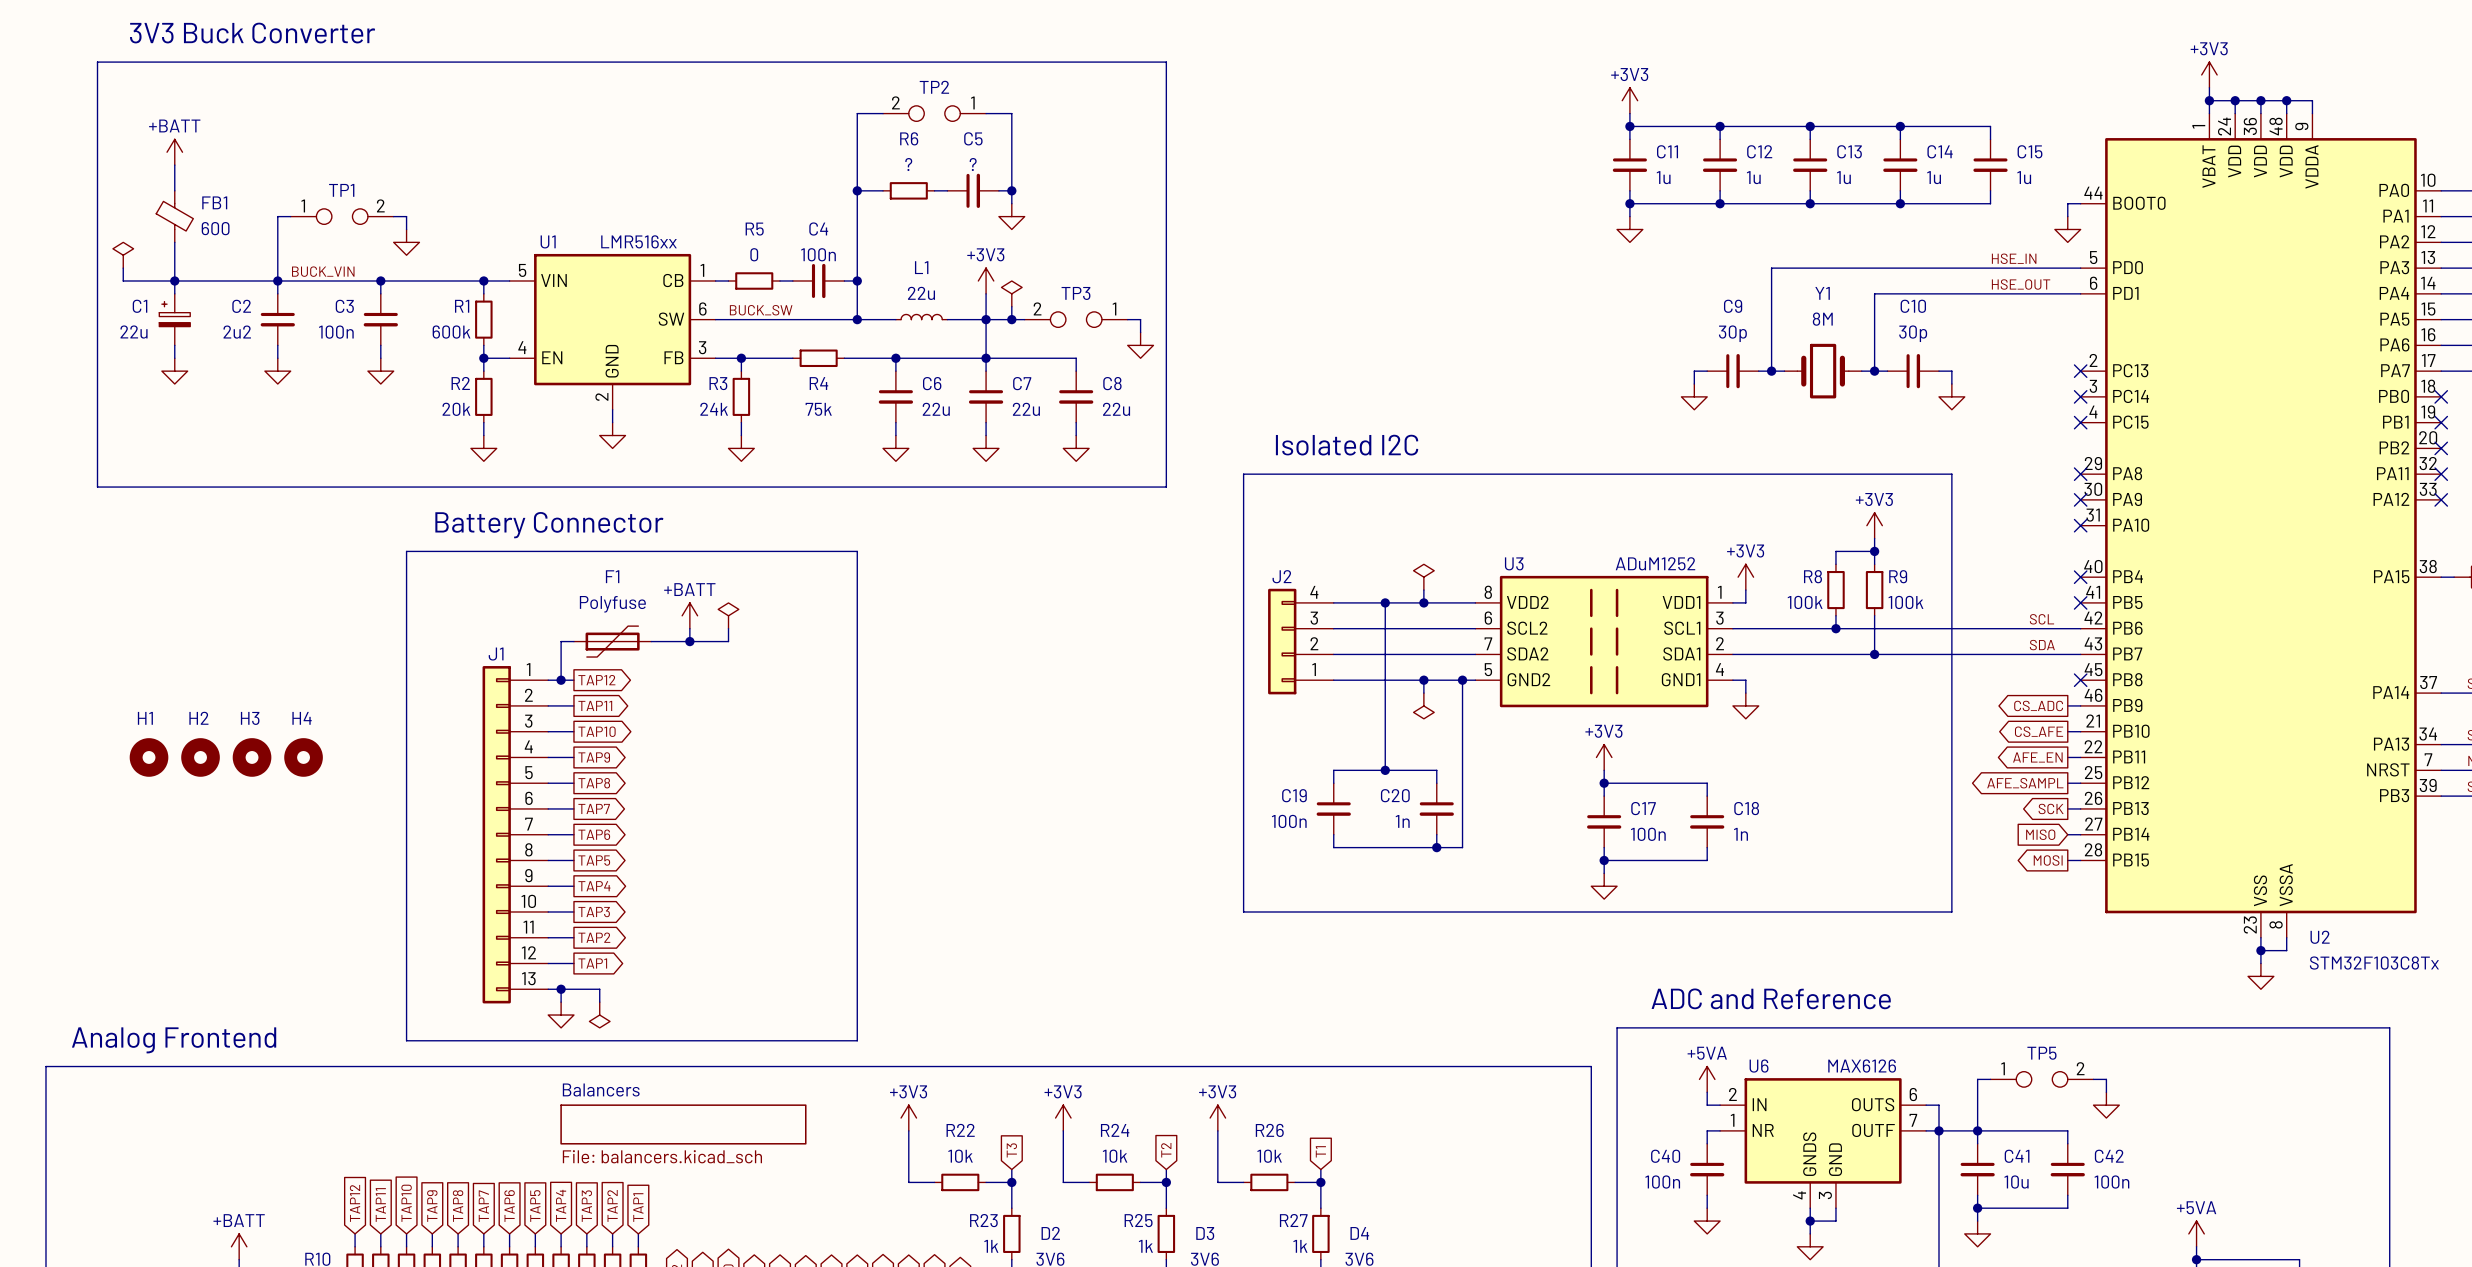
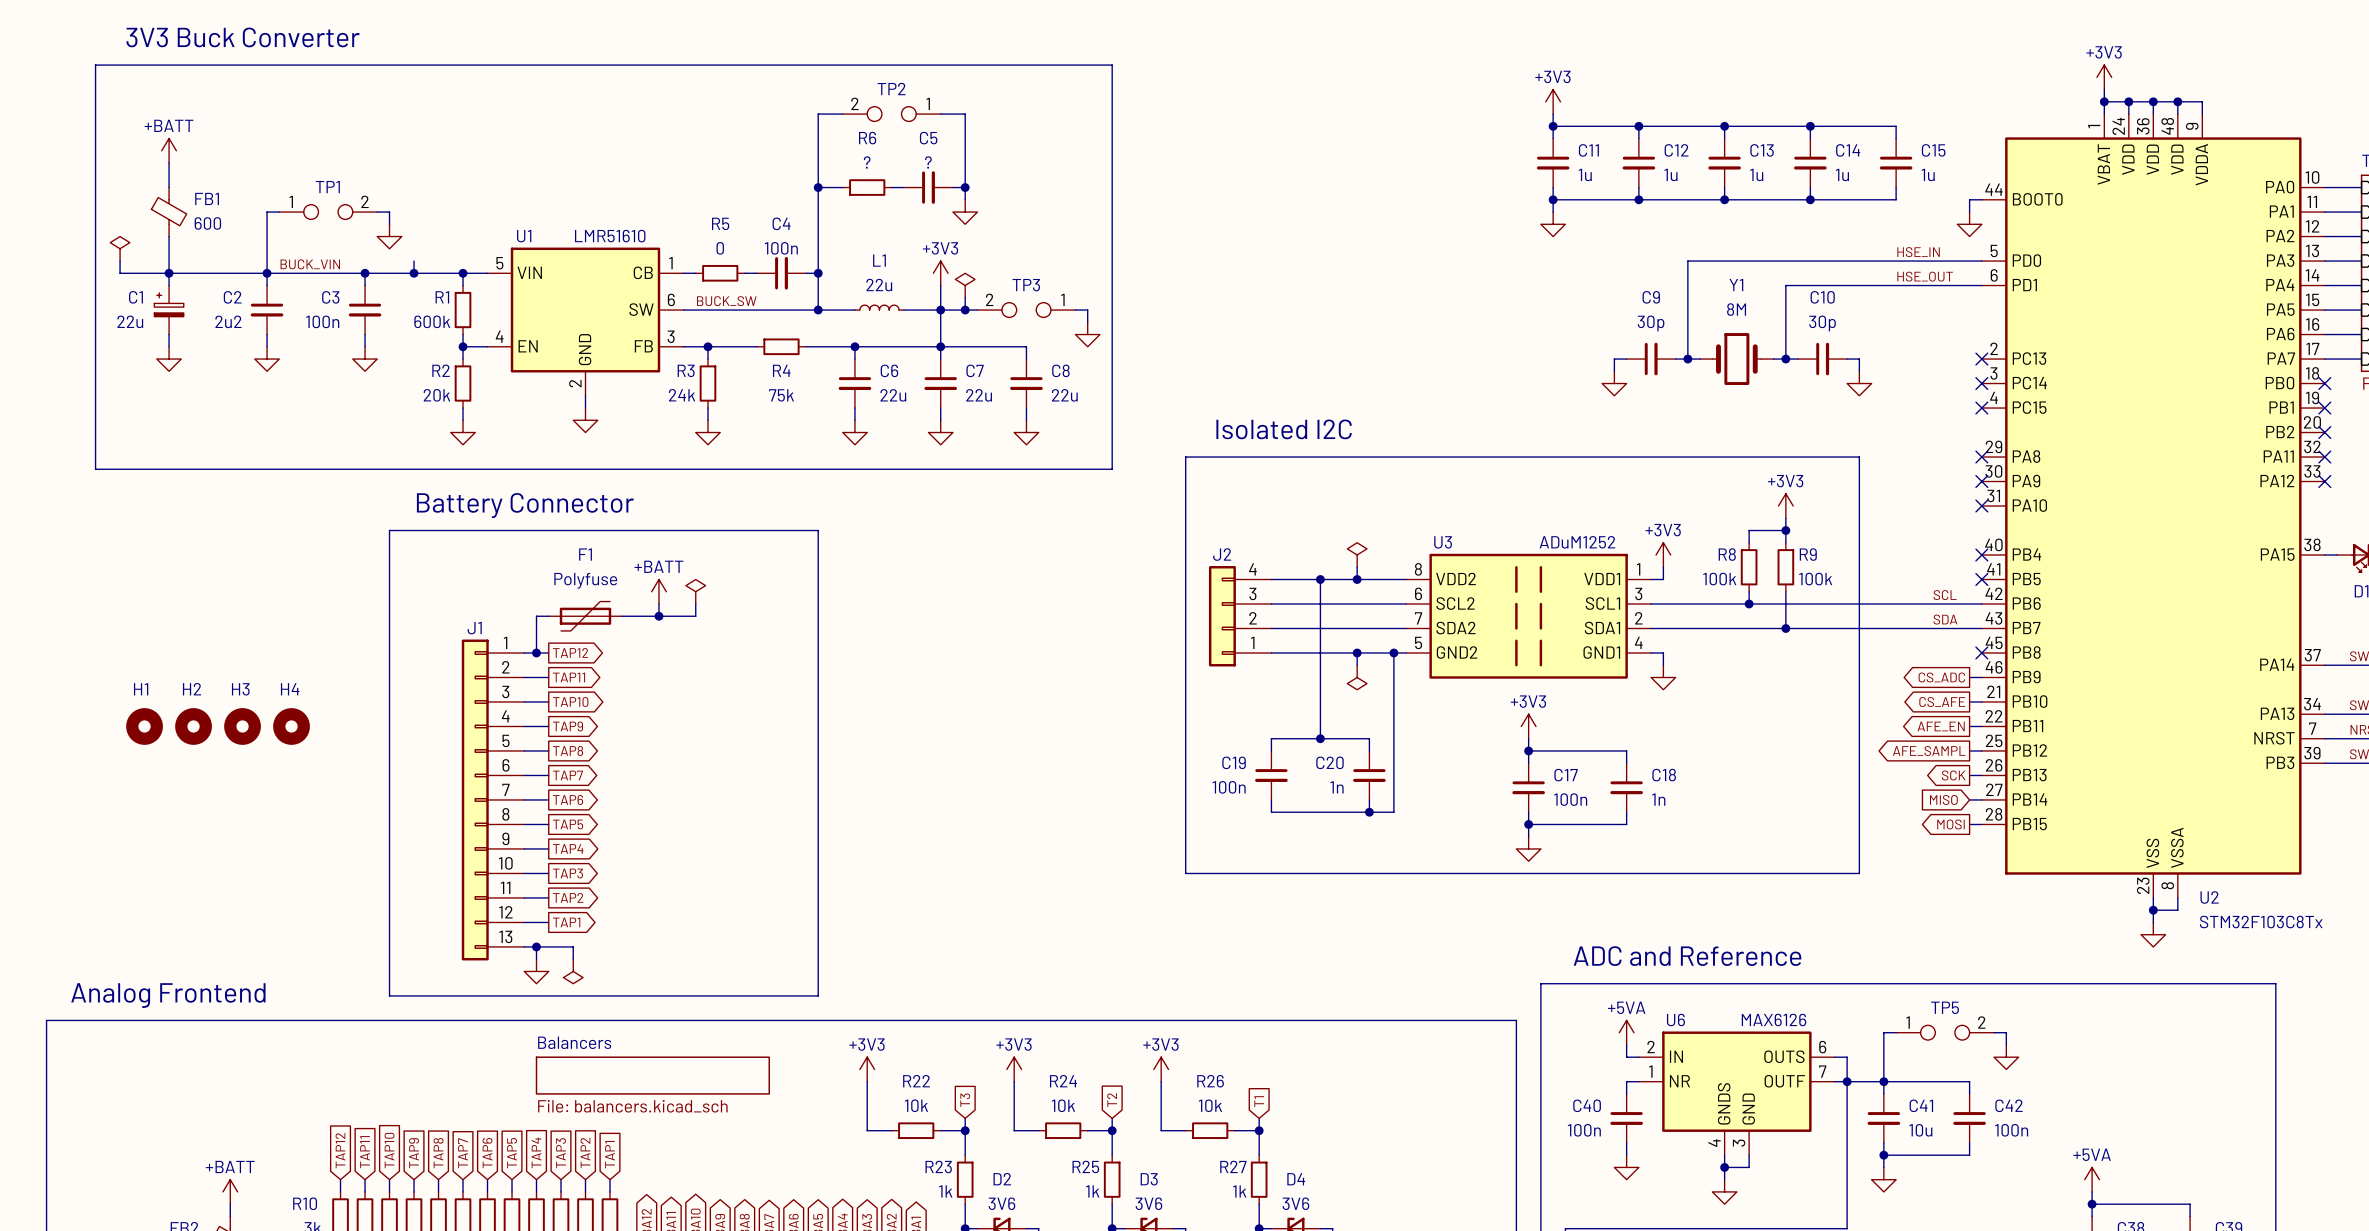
U1 value: LMR516xx (638, 241) -> LMR51610 (610, 236)
wire: none -> (414, 261) (414, 273)
junction: none -> (414, 273)

